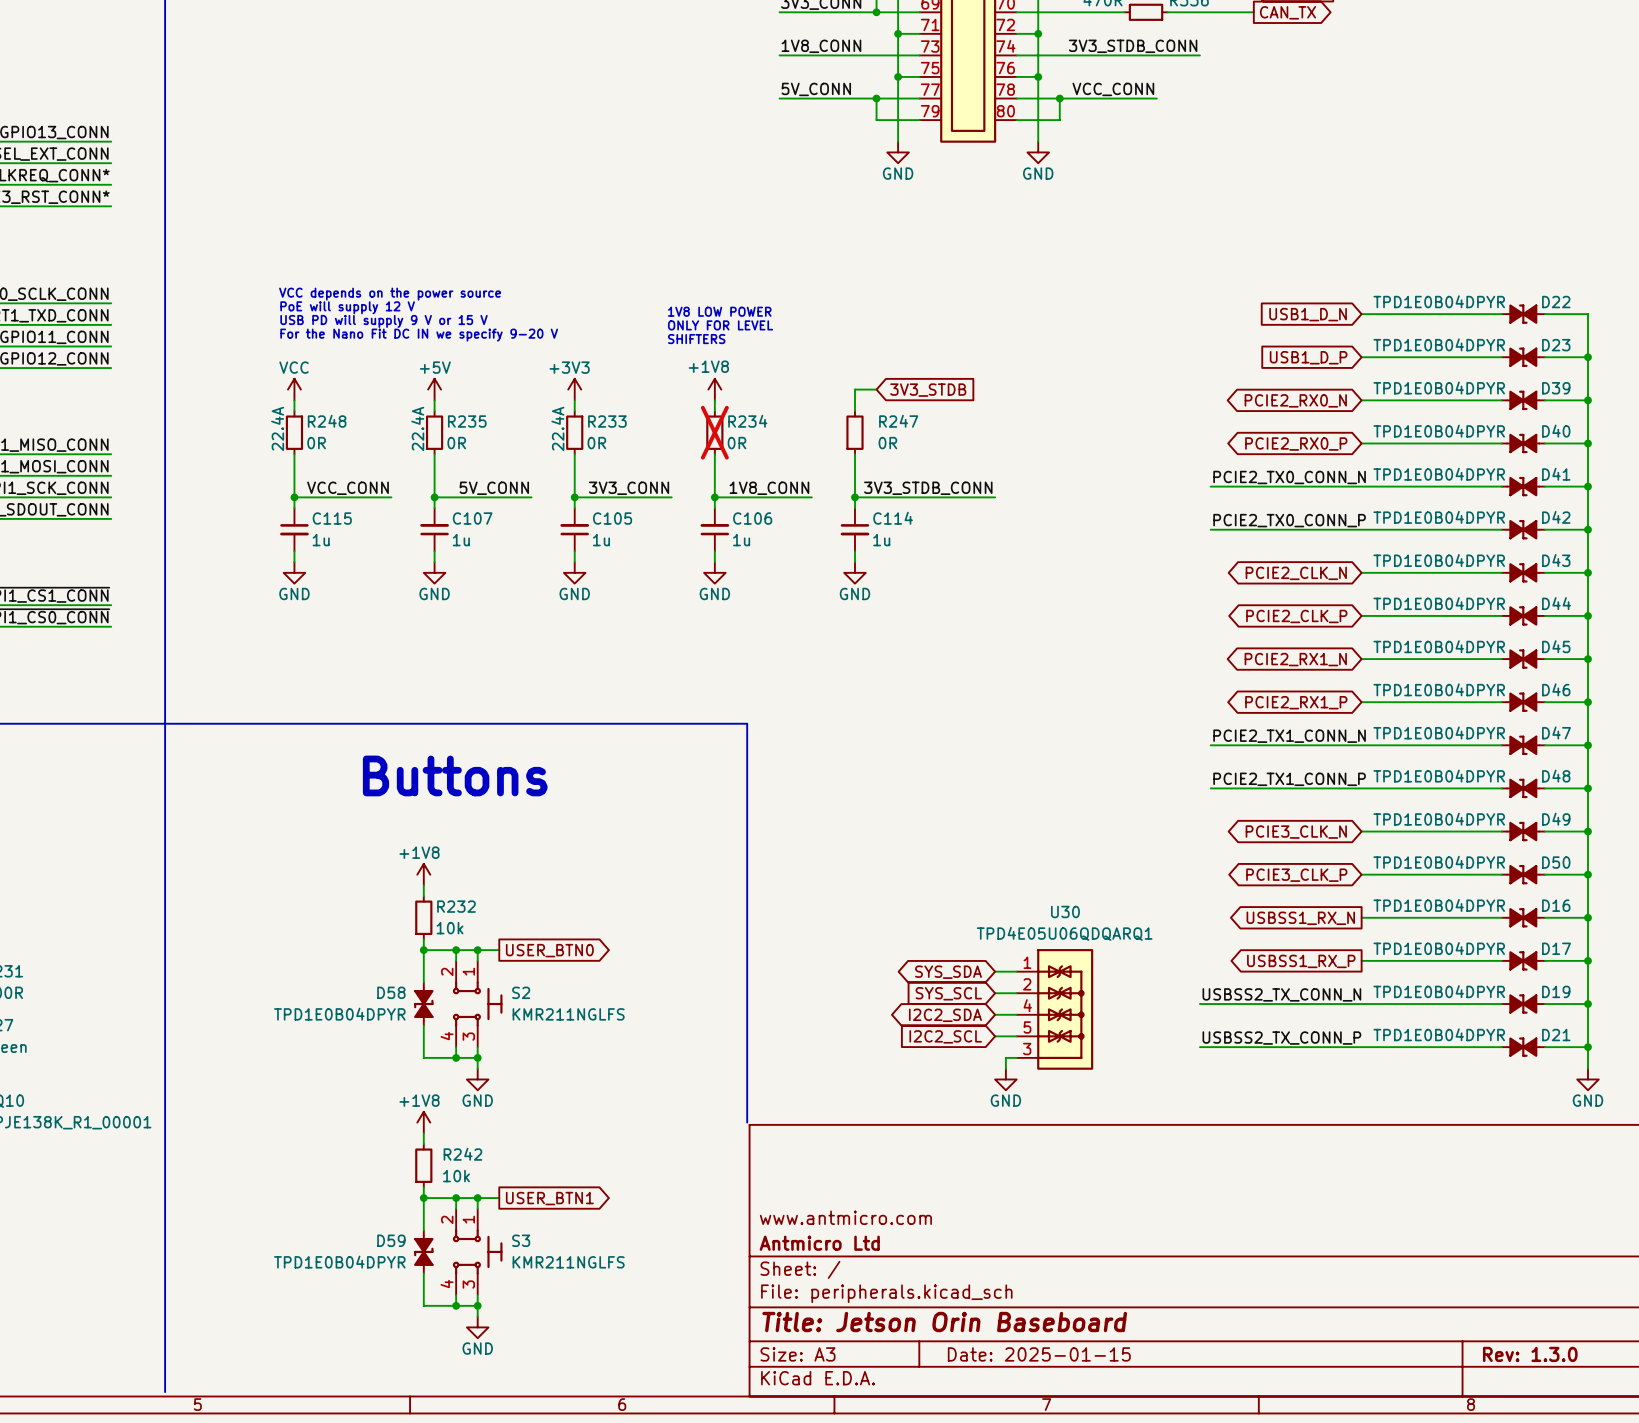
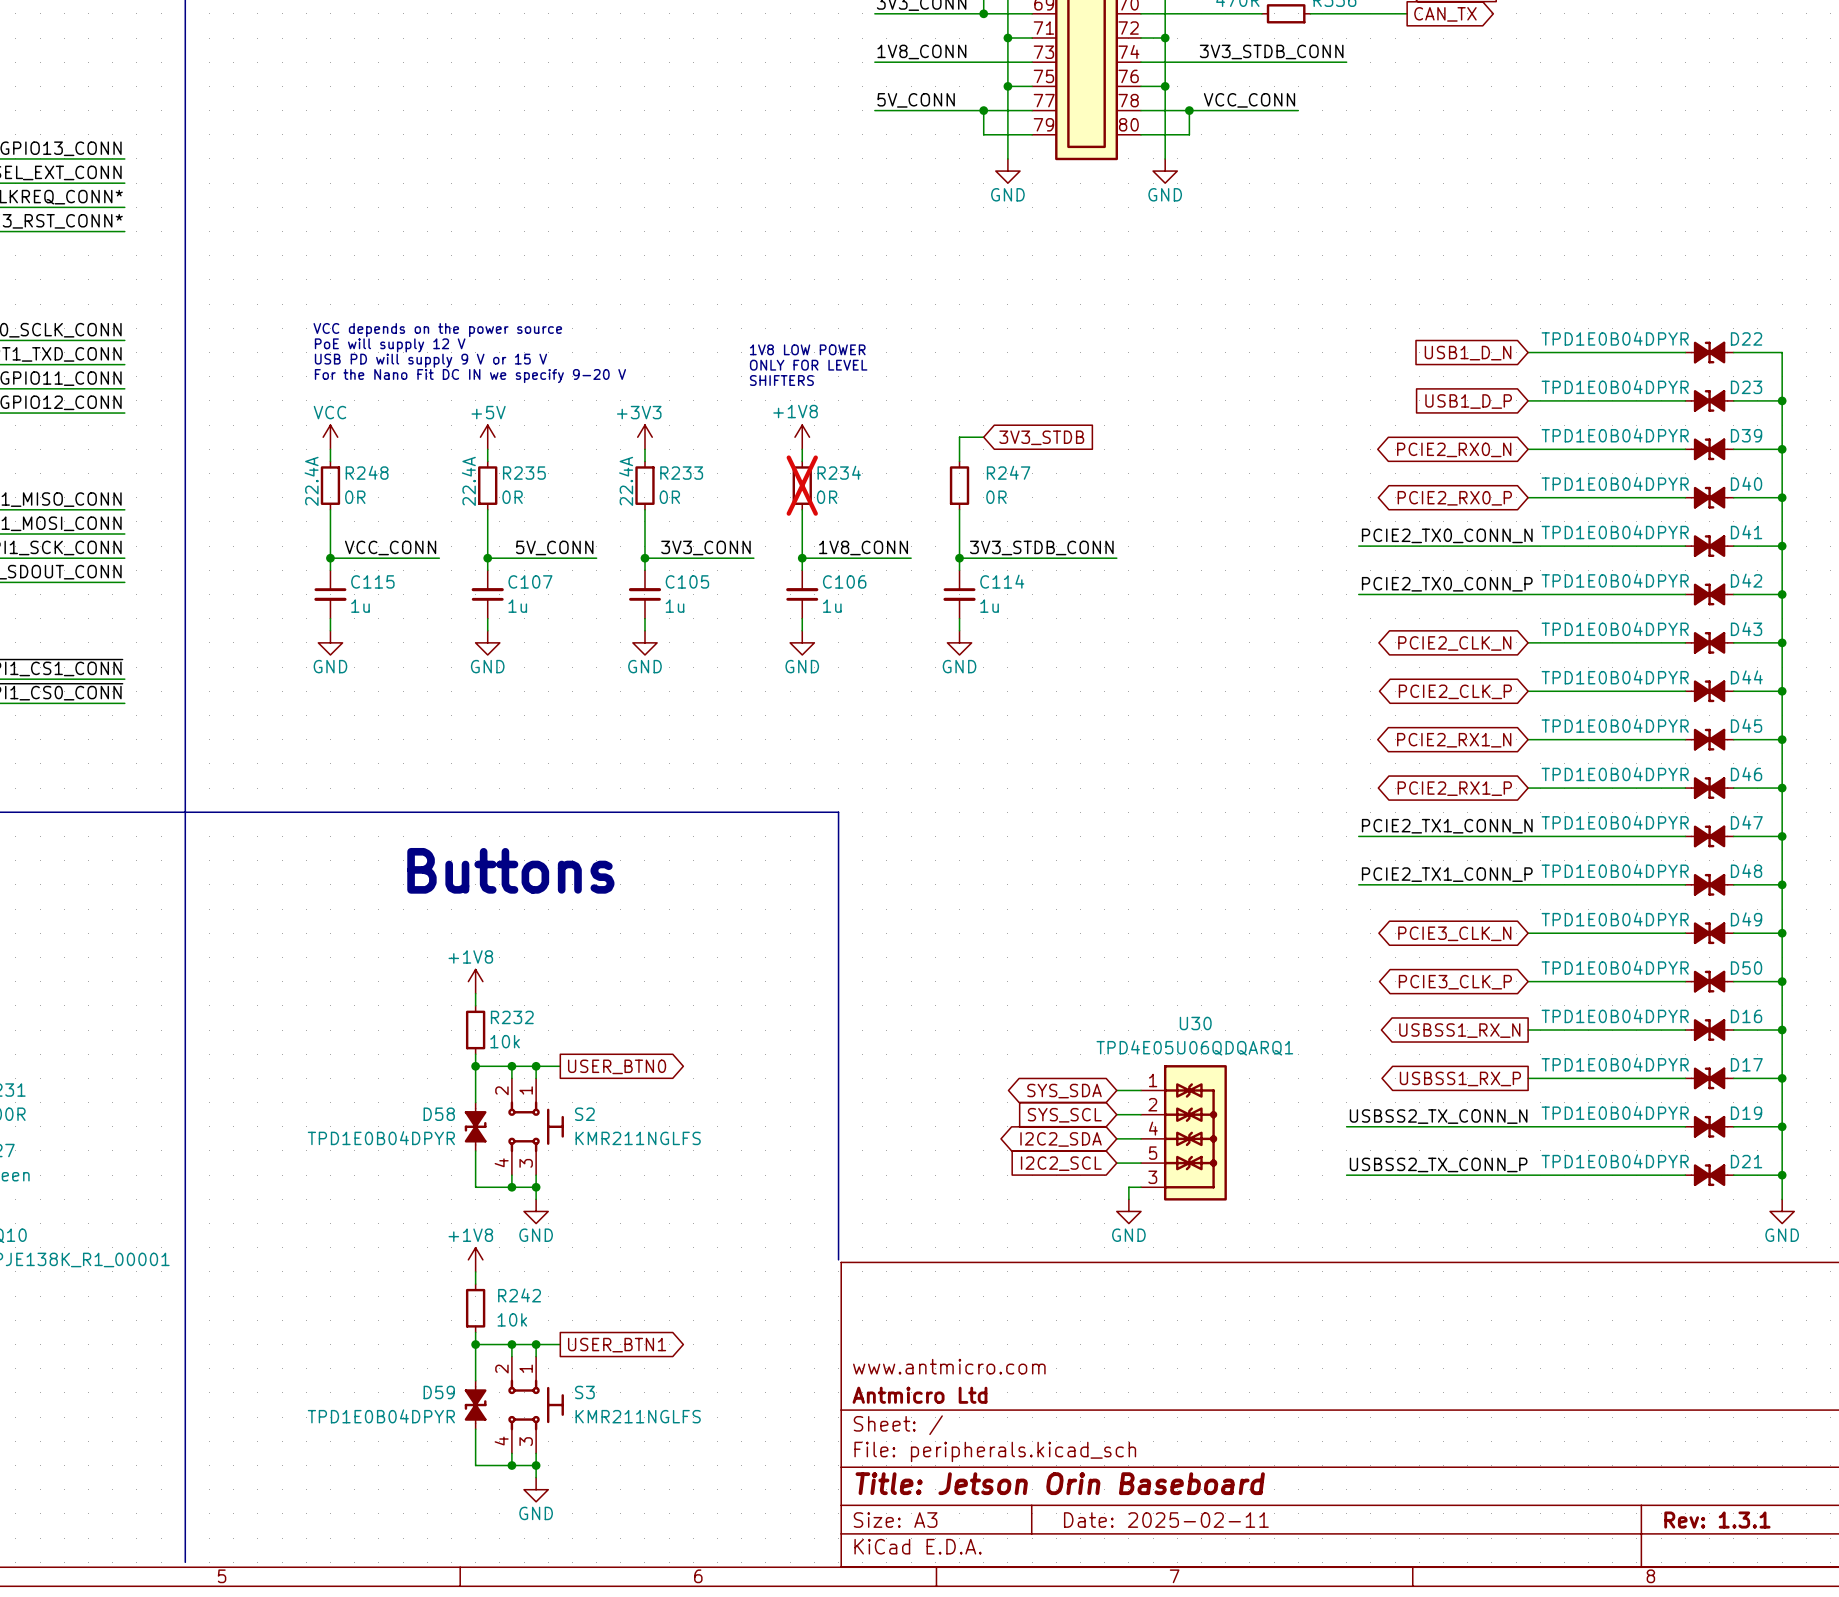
title block: Date: 2025-01-15 (1039, 1354) -> Date: 2025-02-11 (1166, 1520)
title block: Rev: 1.3.0 (1530, 1354) -> Rev: 1.3.1 (1717, 1520)

